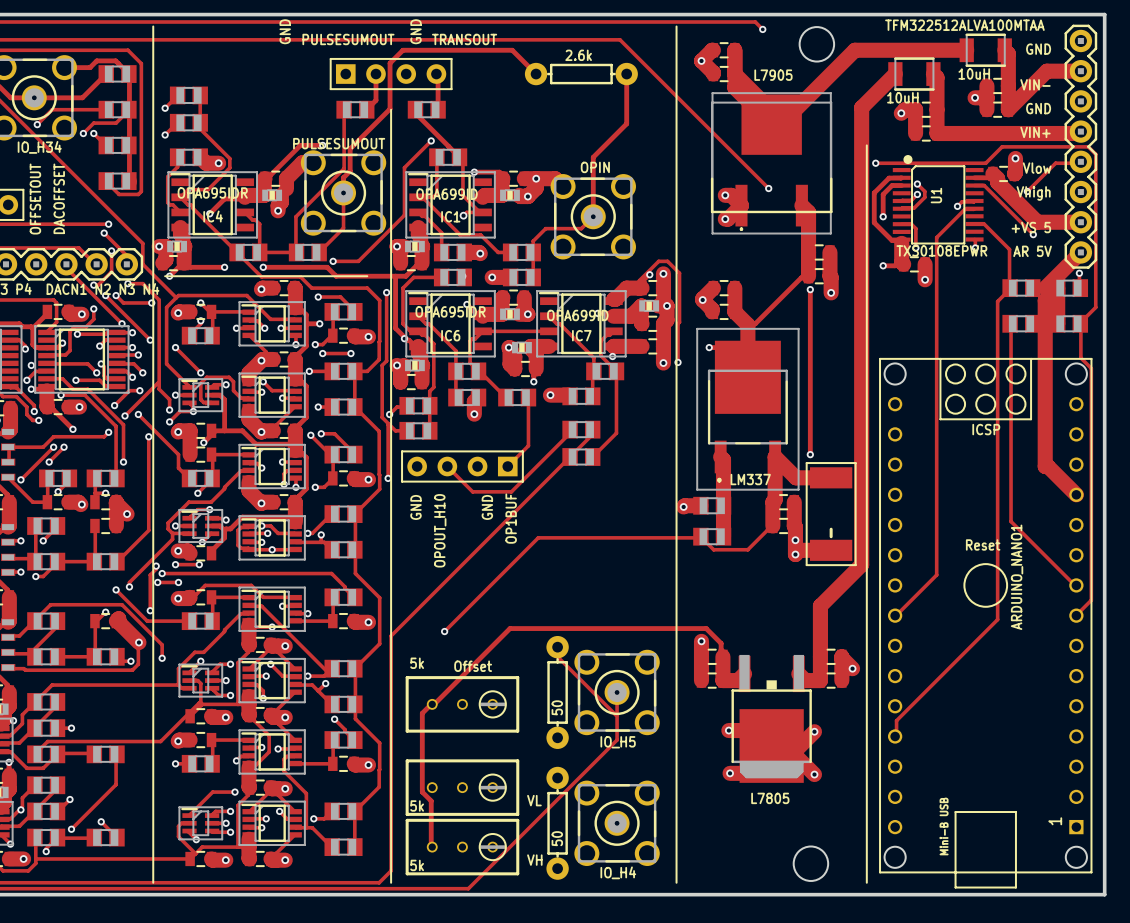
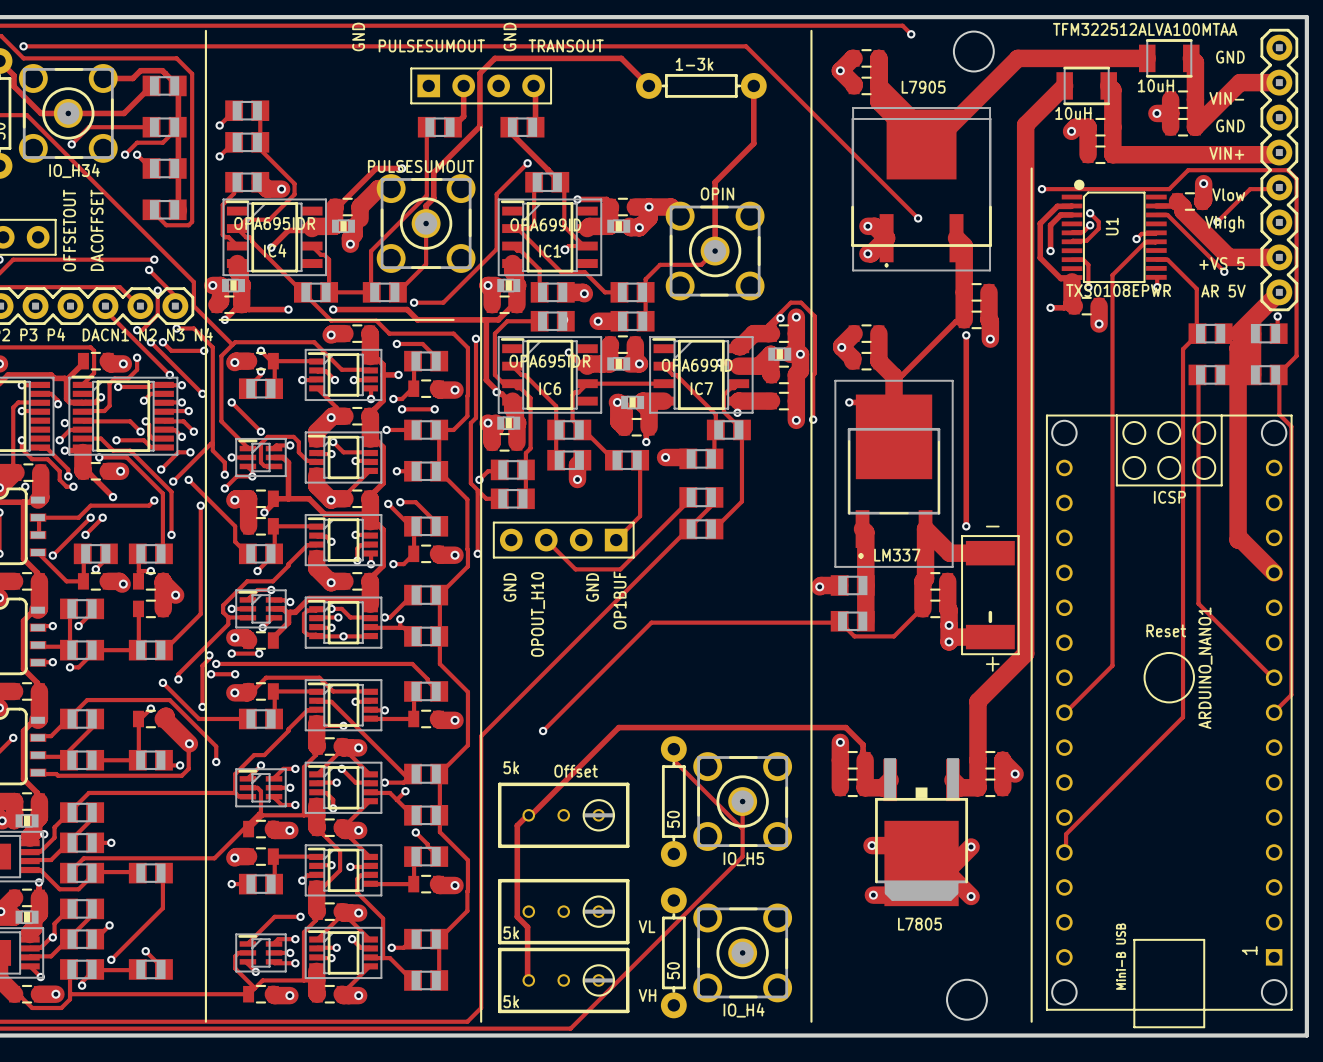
part value: 2.6k (578, 55) -> 1-3k (694, 64)
text: none -> - (992, 526)
text: none -> + (992, 664)

